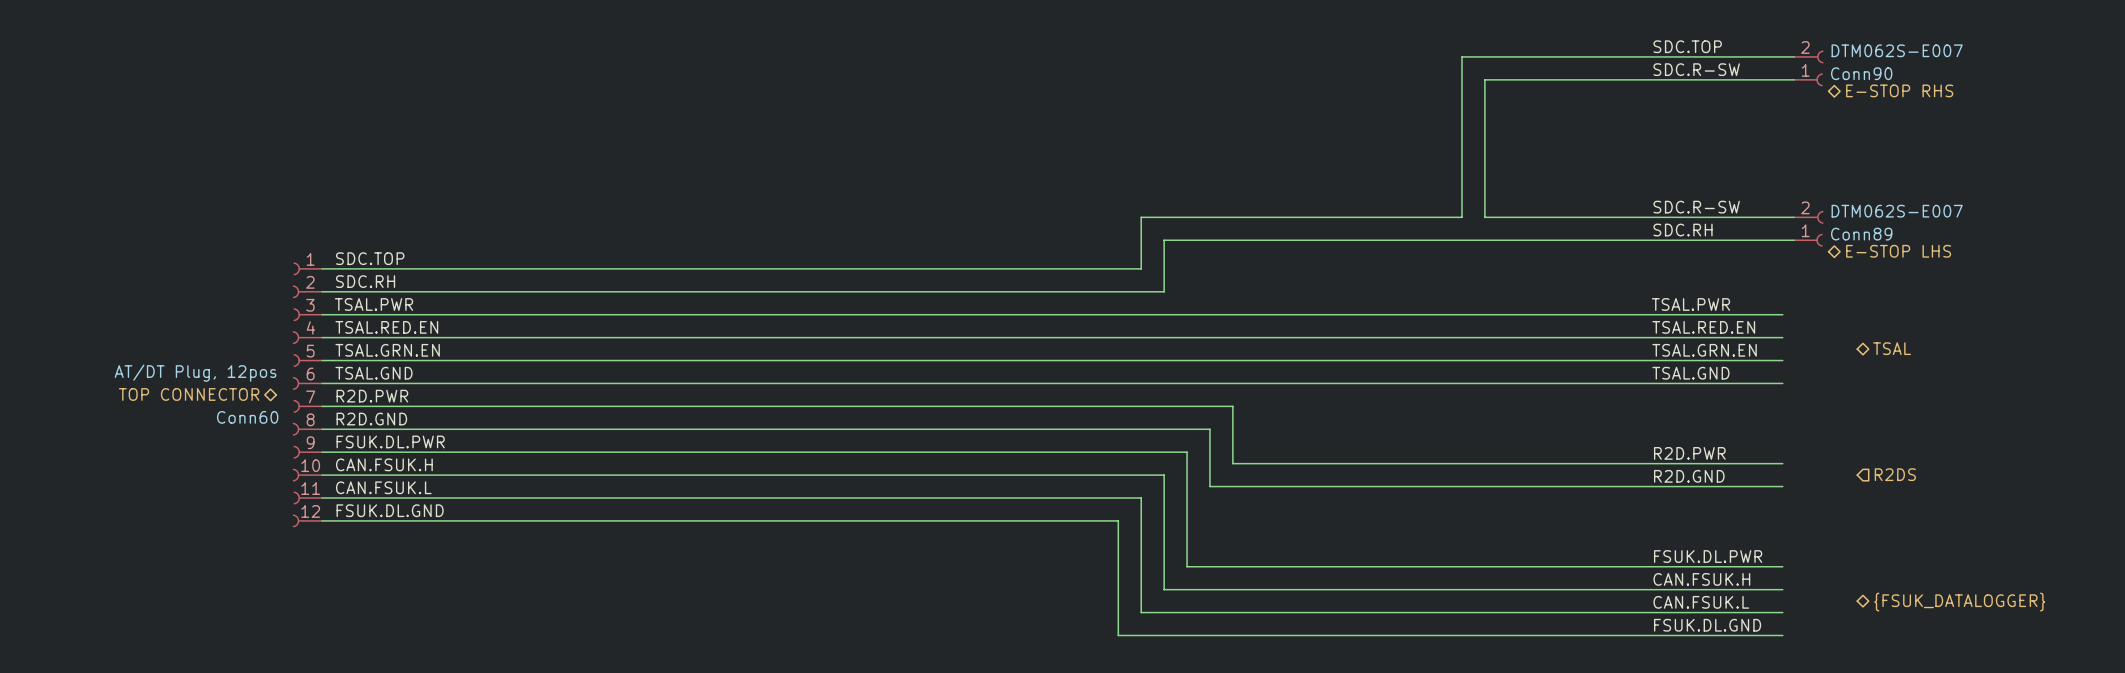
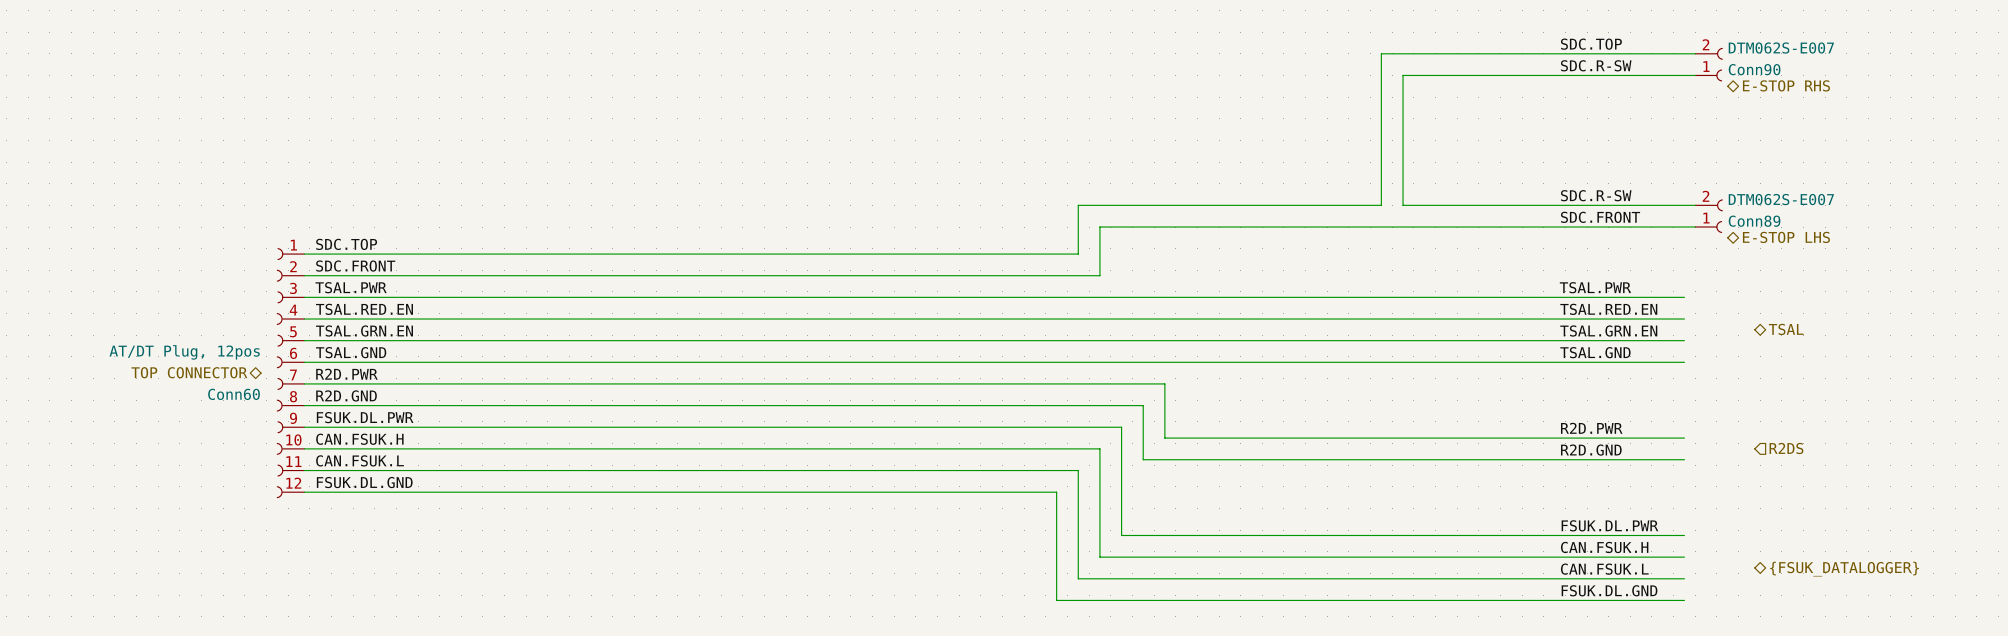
label: SDC.RH (1683, 230) -> SDC.FRONT (1600, 217)
label: SDC.RH (365, 281) -> SDC.FRONT (355, 266)

